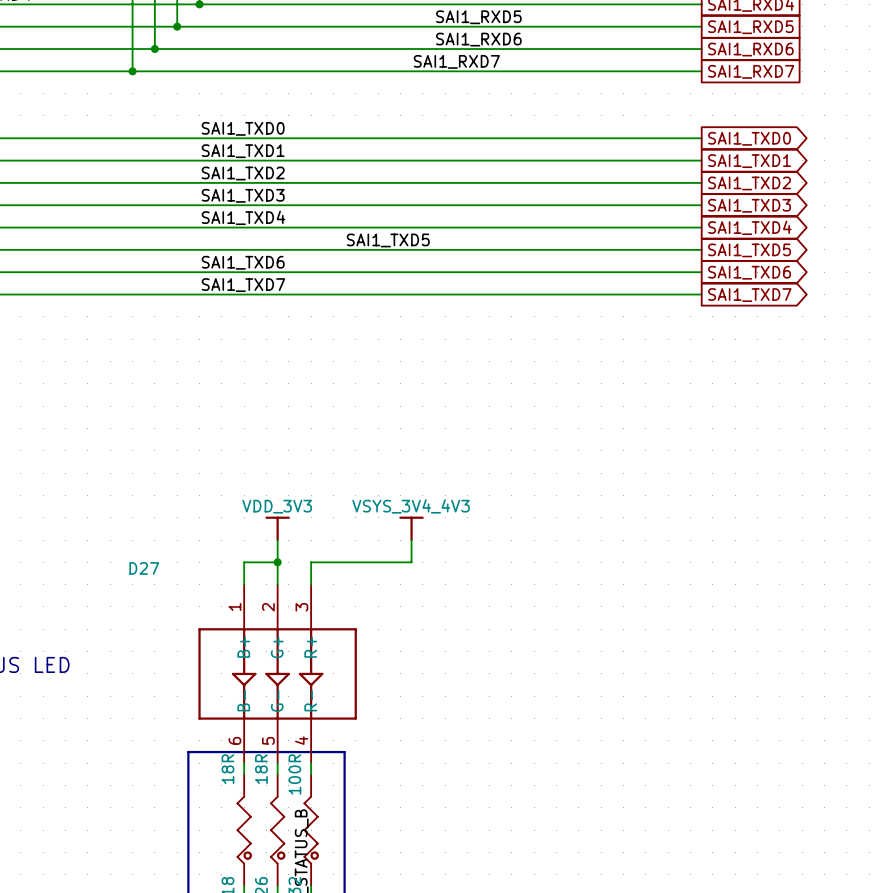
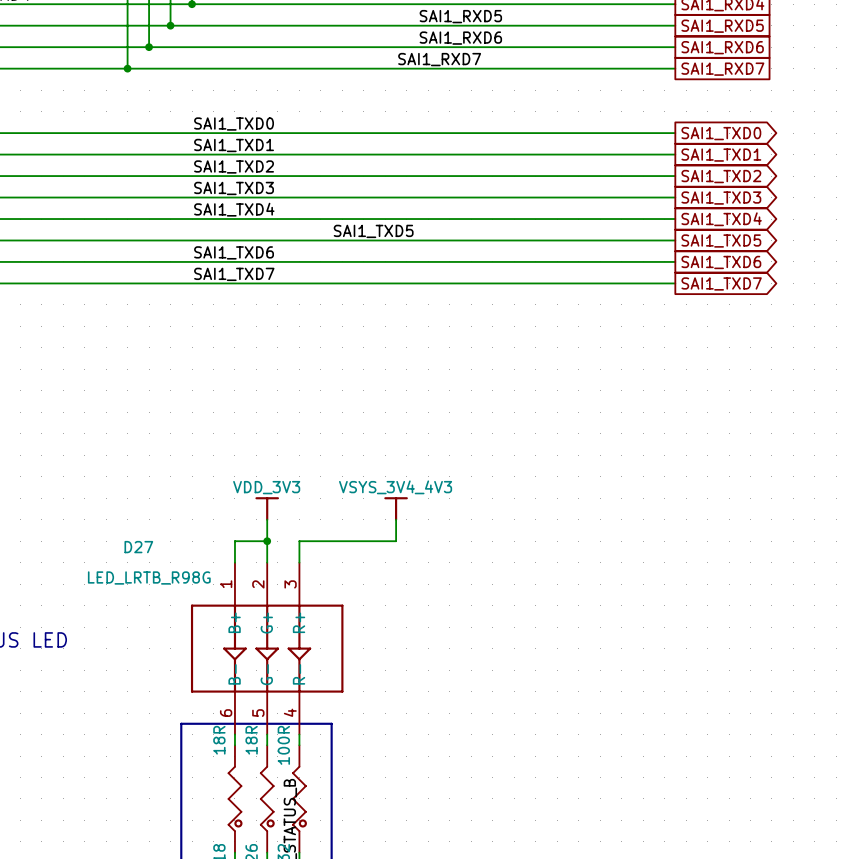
D27 value: none -> LED_LRTB_R98G (149, 577)

